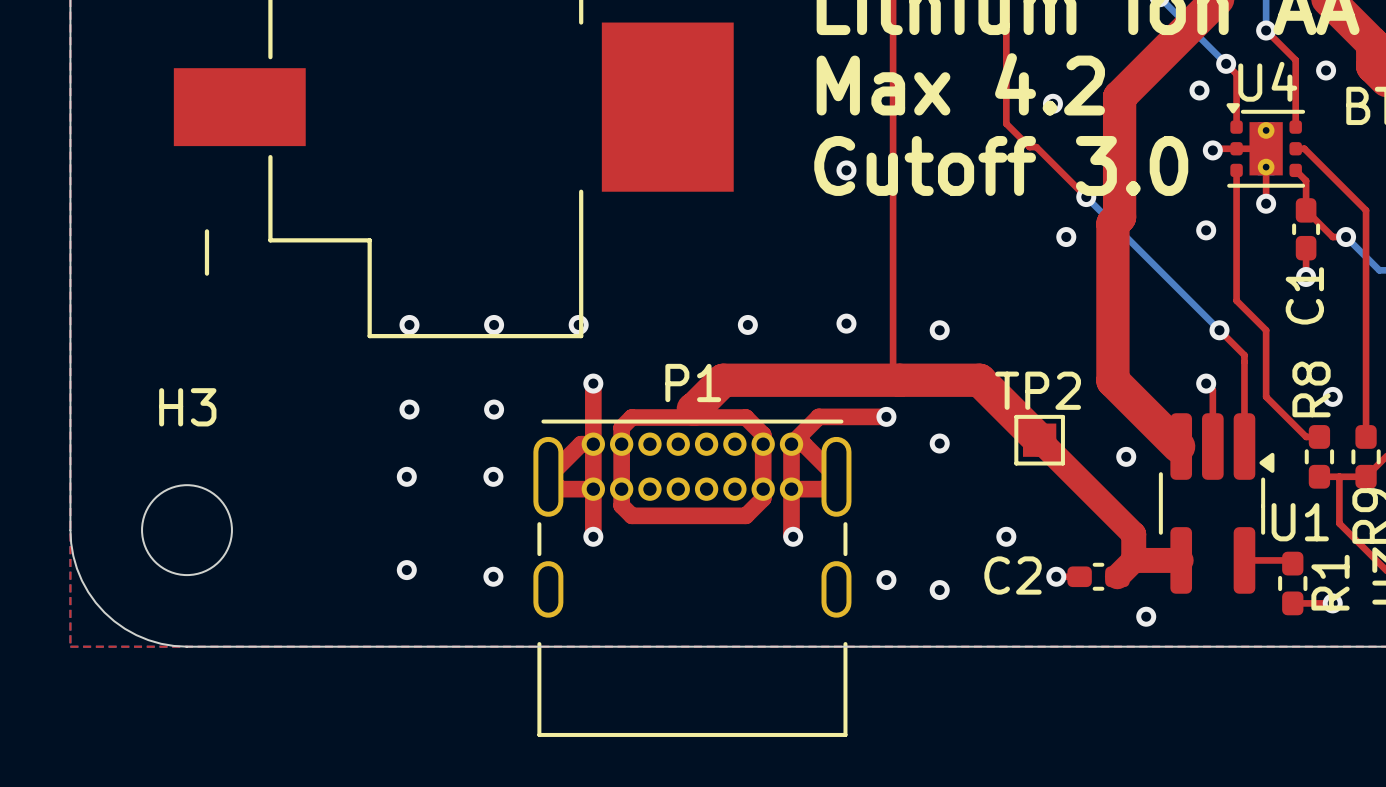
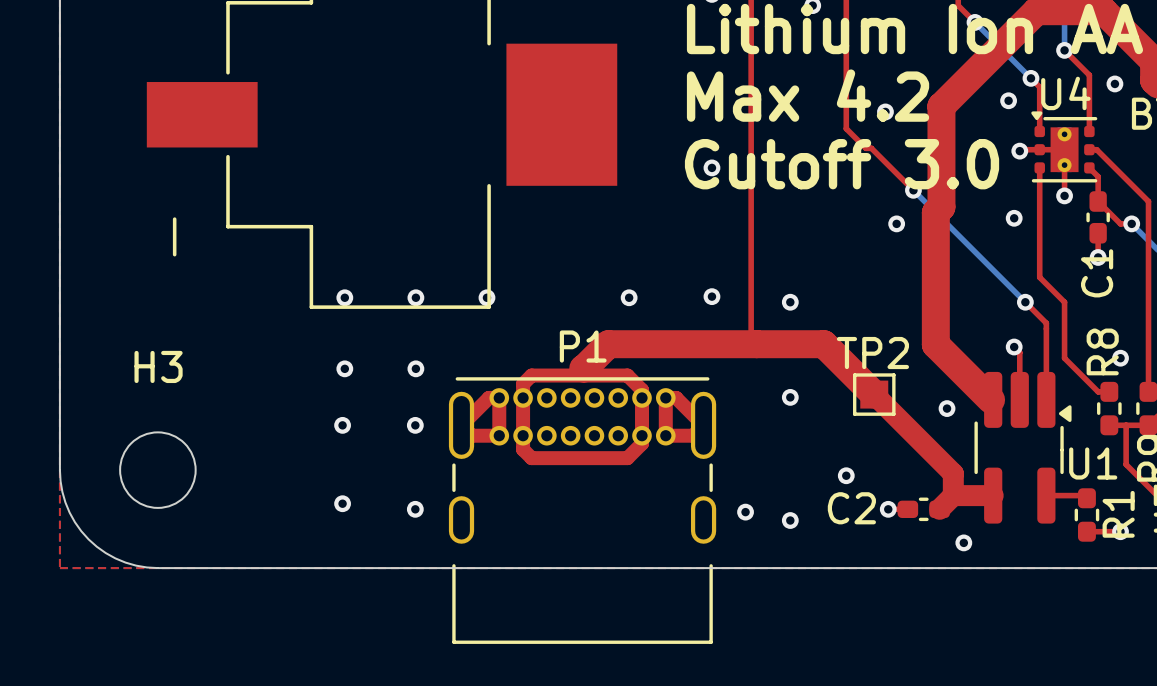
top track: (593, 383) (593, 444) -> none
via: (593, 383) -> none
top track: (886, 416) (818, 416) (791, 444) -> none
via: (886, 416) -> none
top track: (593, 489) (593, 536) -> none
top track: (791, 489) (791, 535) (793, 536) -> none
via: (593, 536) -> none
via: (793, 536) -> none

